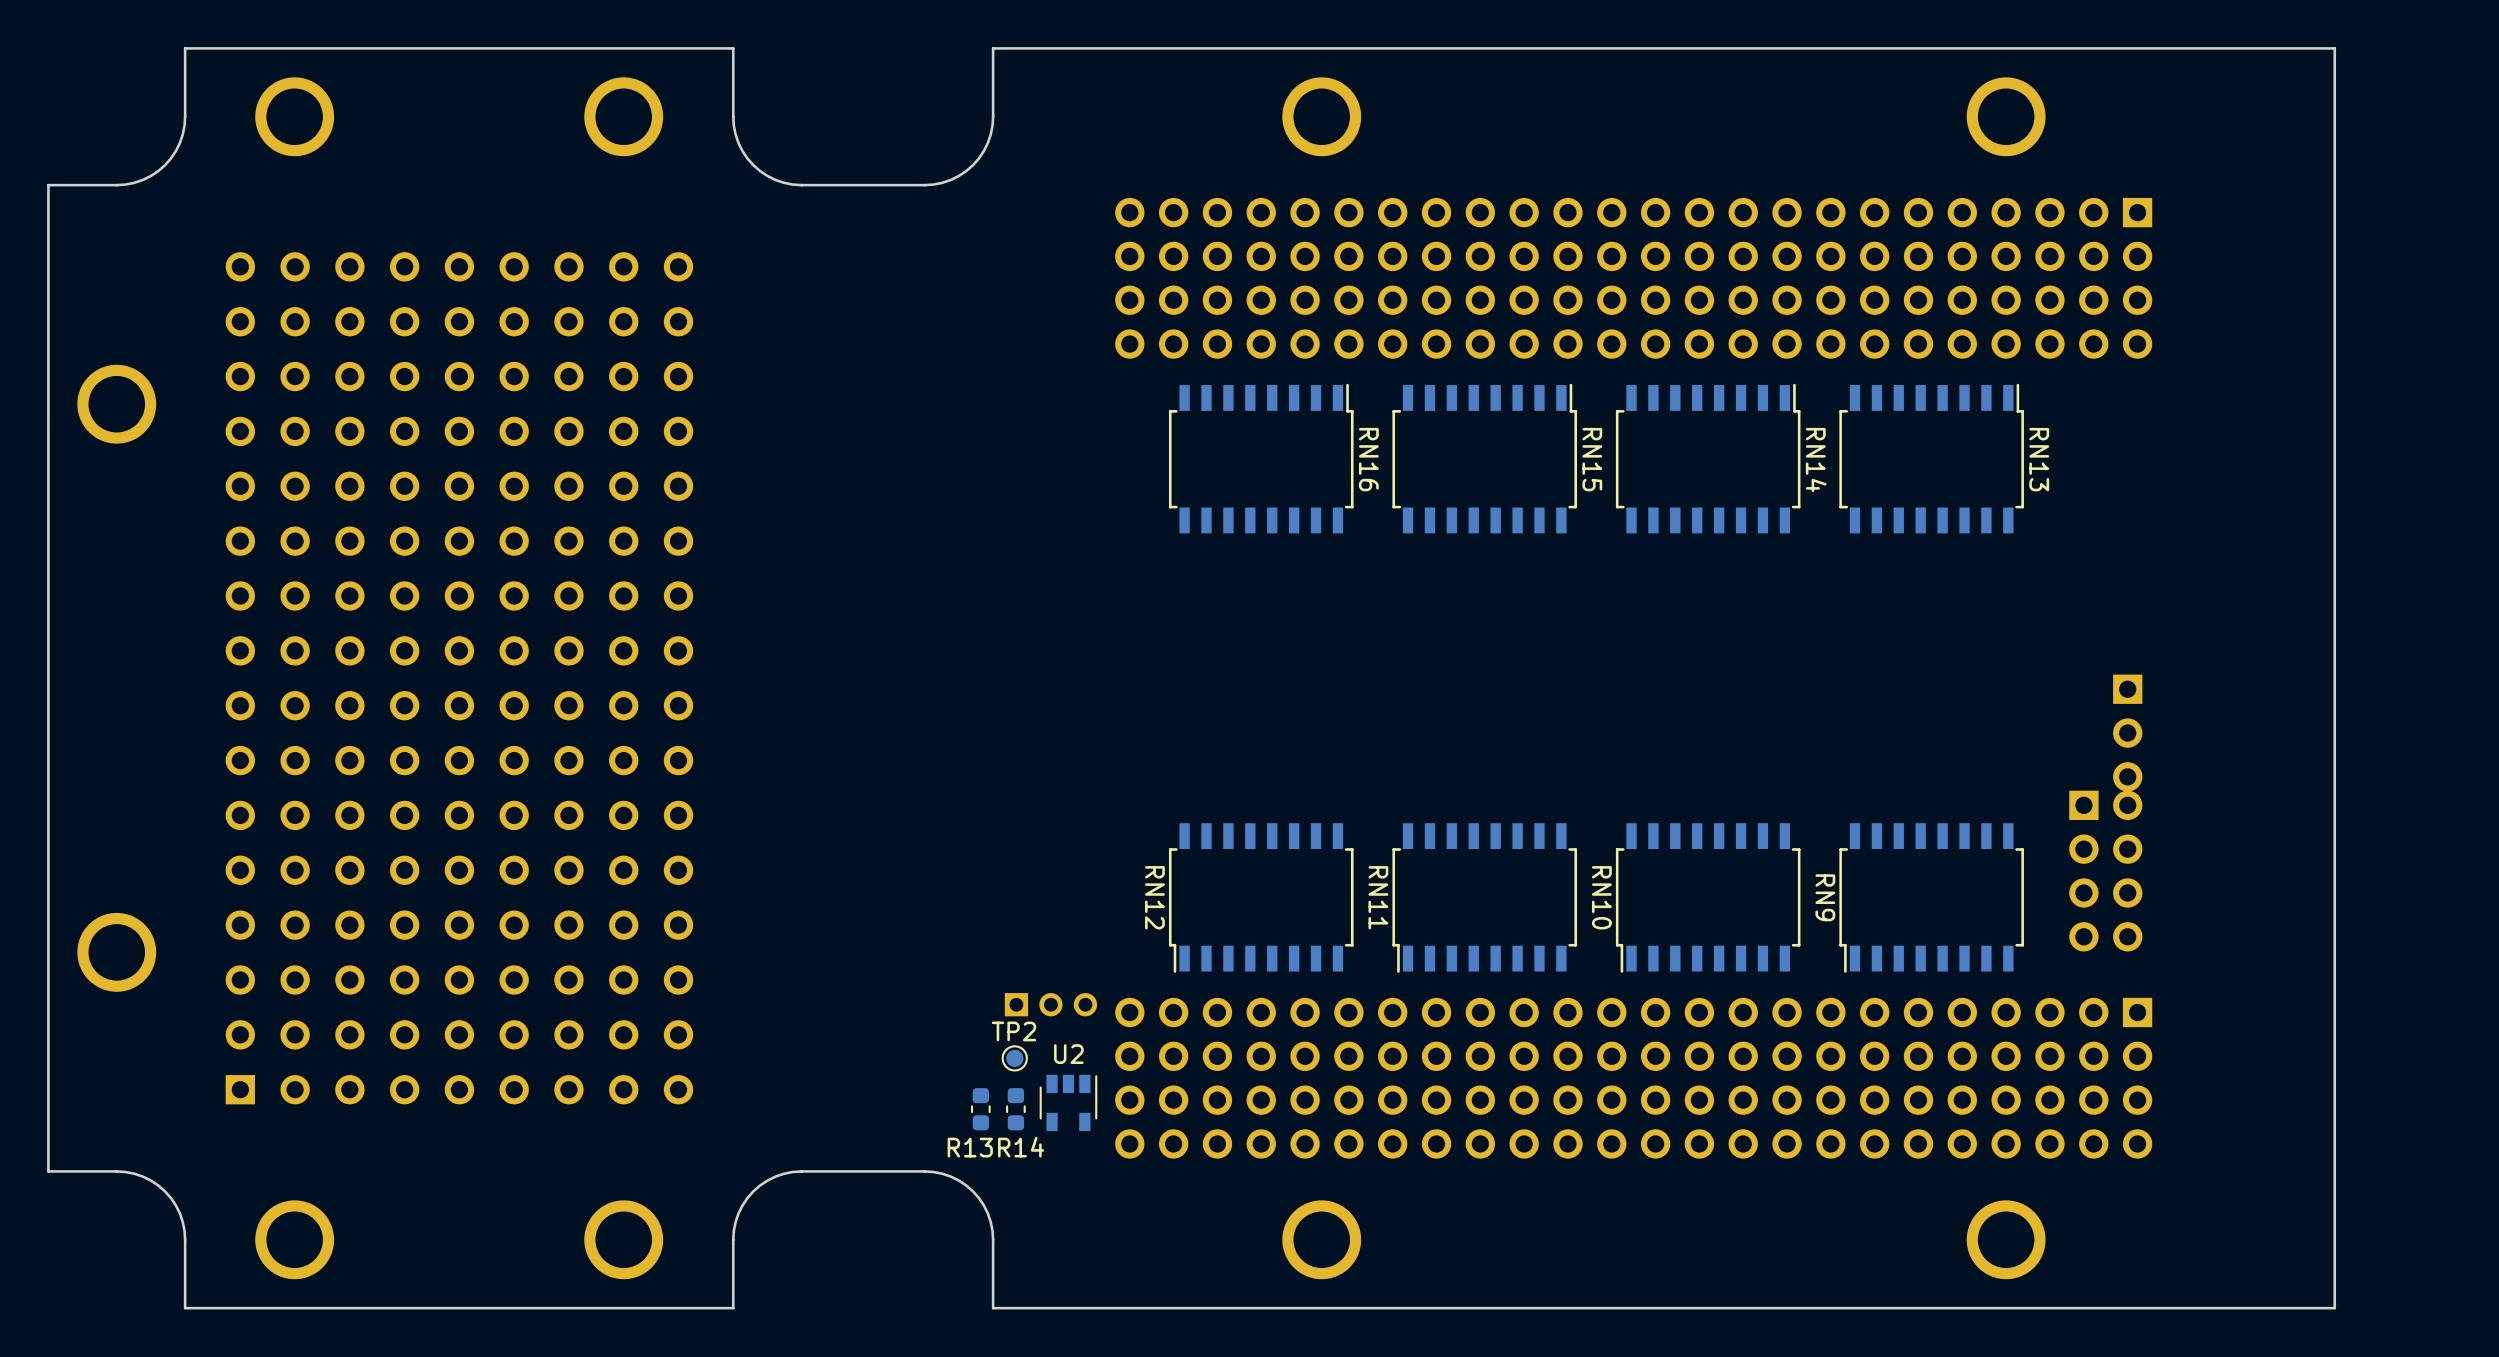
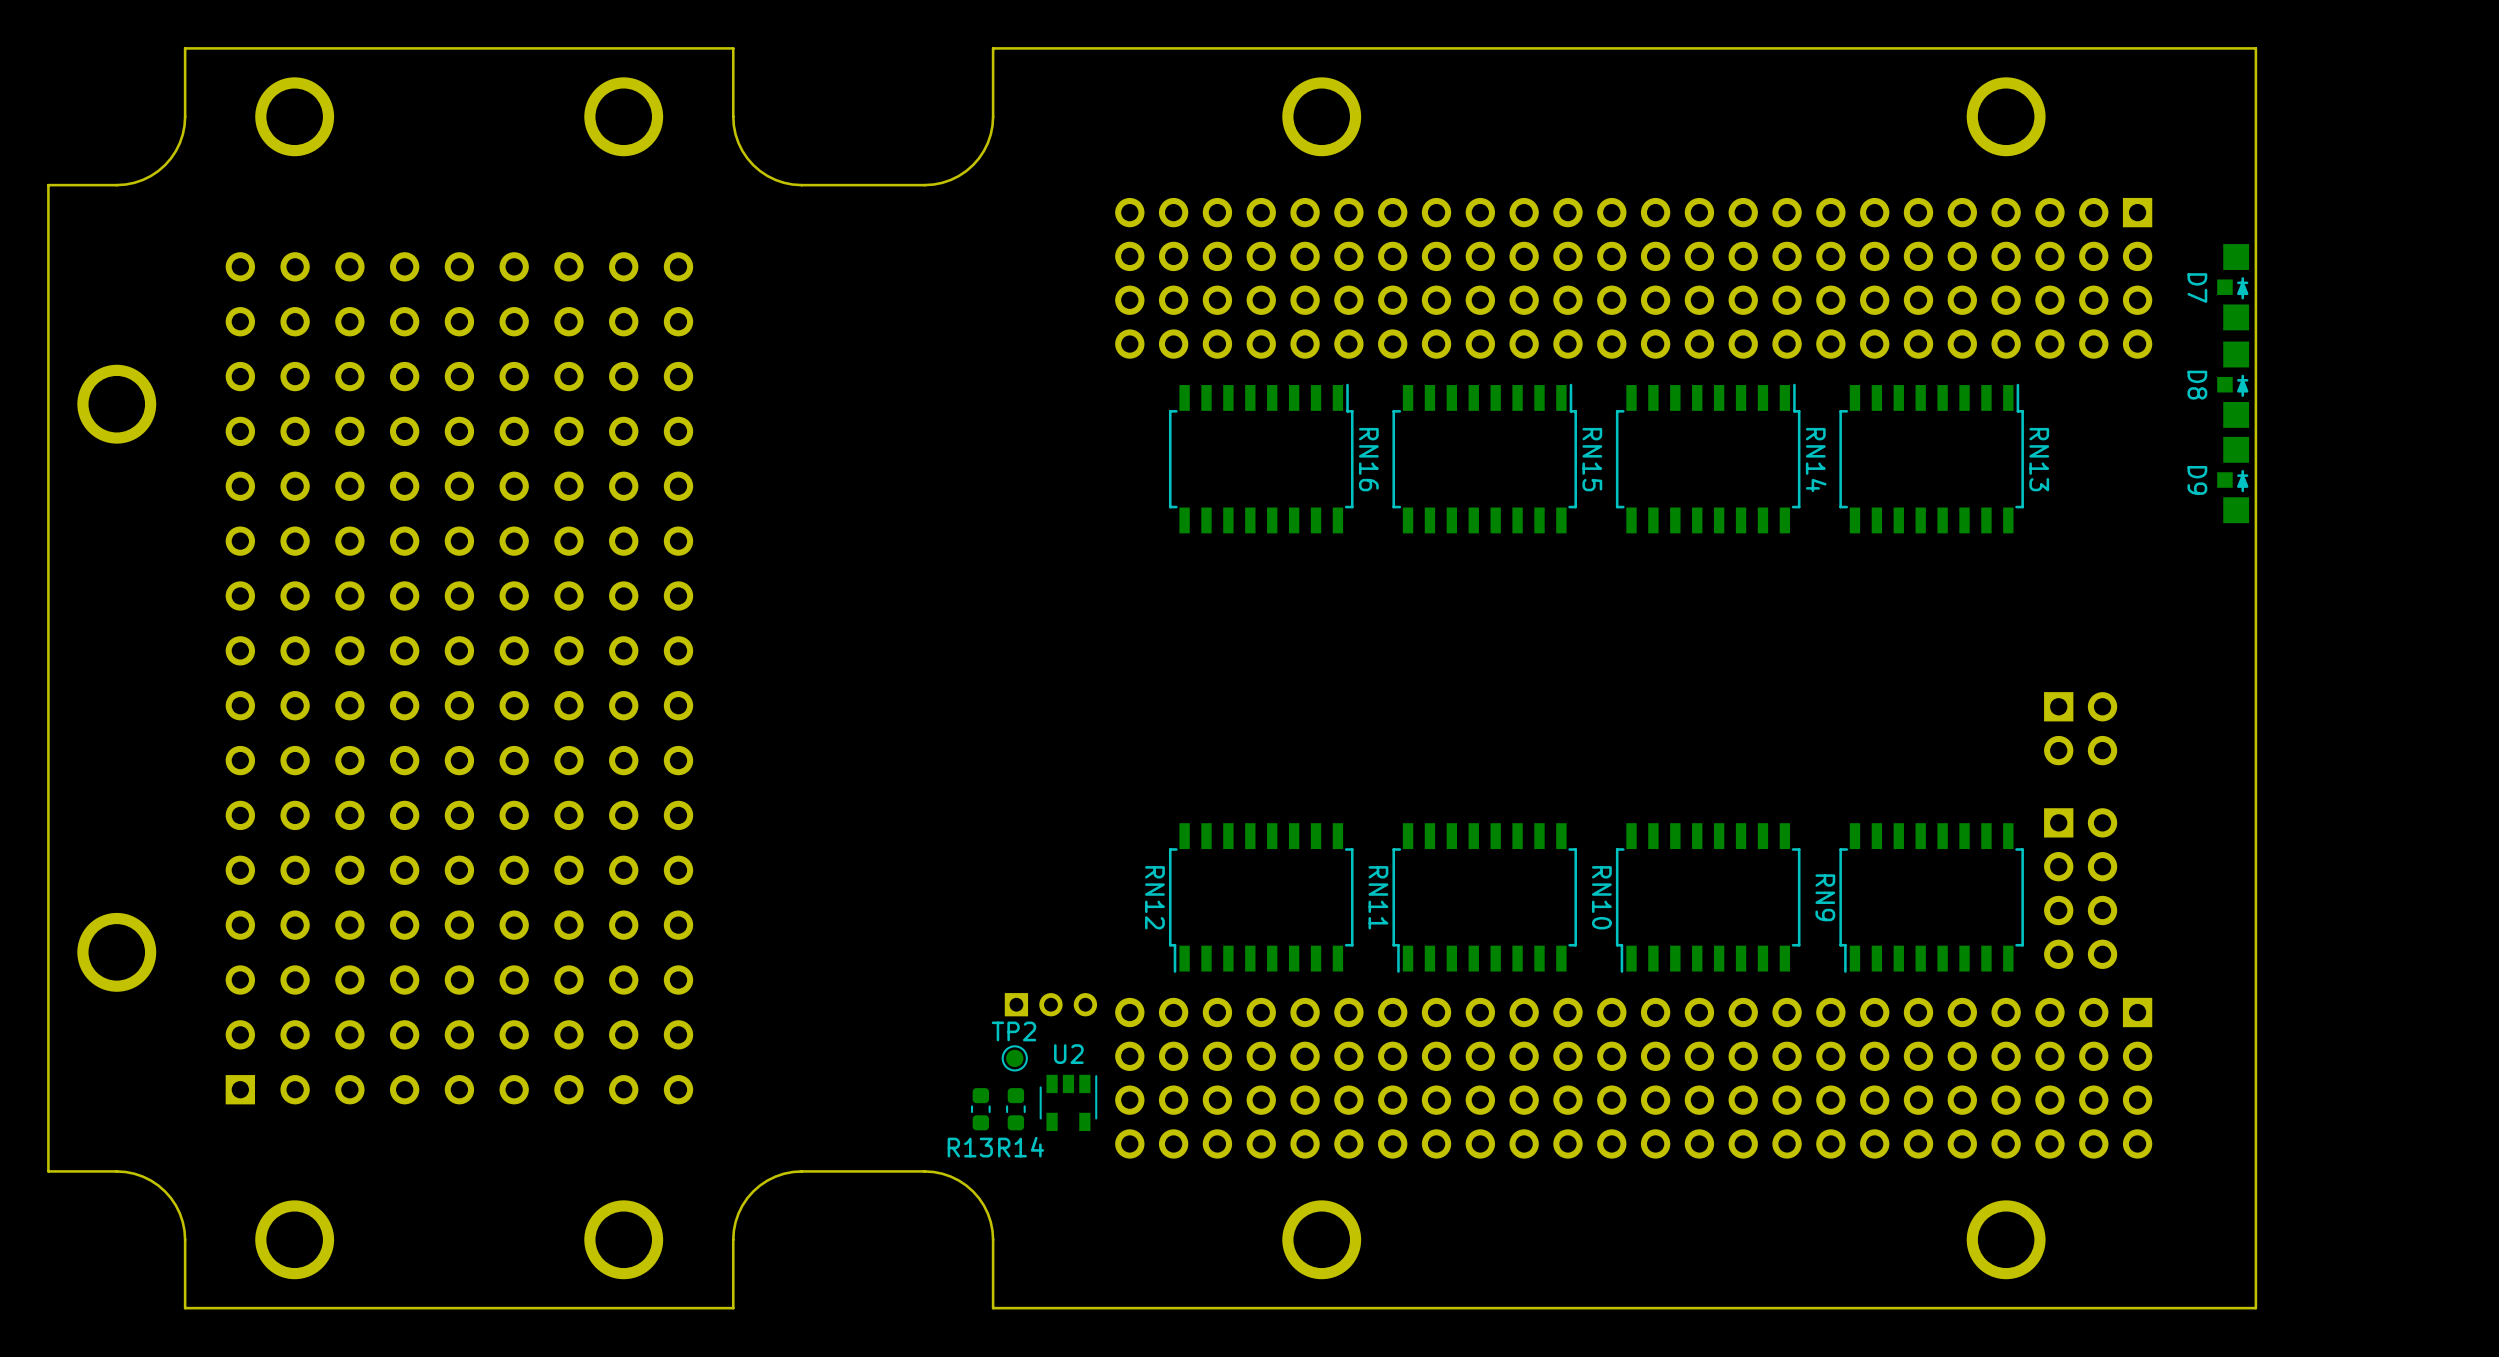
board edge: (2255, 48) (2334, 48) (2334, 1308) (2255, 1308) -> (2255, 48) (2255, 1308)
D7: none -> (2233, 287)
D8: none -> (2233, 384)
D9: none -> (2233, 480)
part: none -> (2080, 728)
part: (2127, 733) -> none
part position: (2105, 871) -> (2080, 888)

